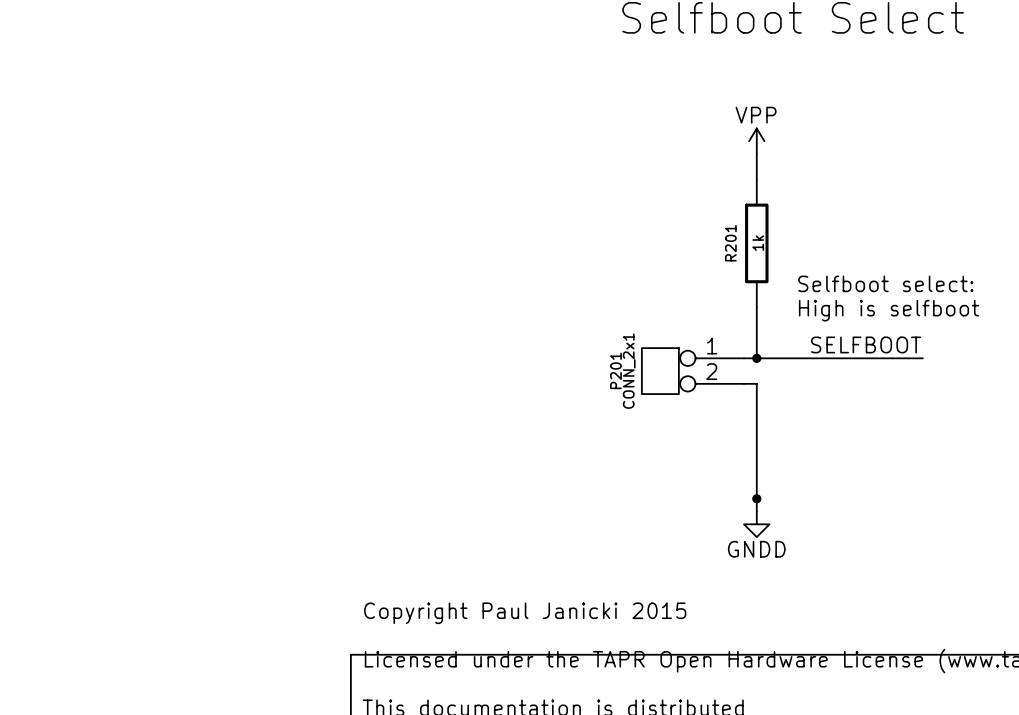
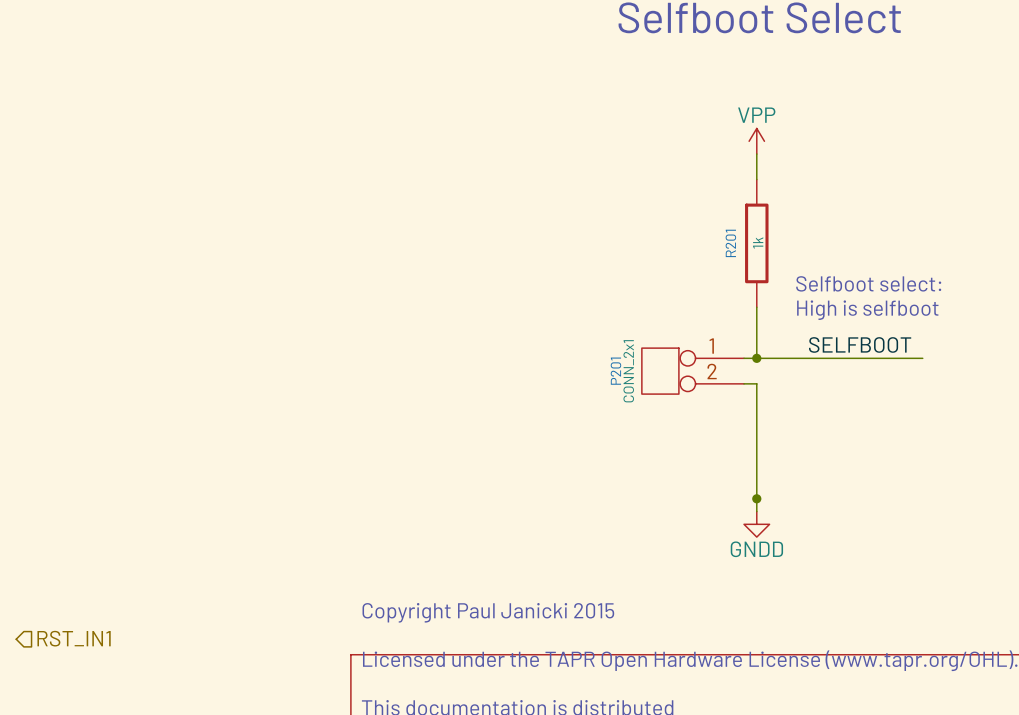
hierarchical label: none -> RST_IN1 (74, 638)

